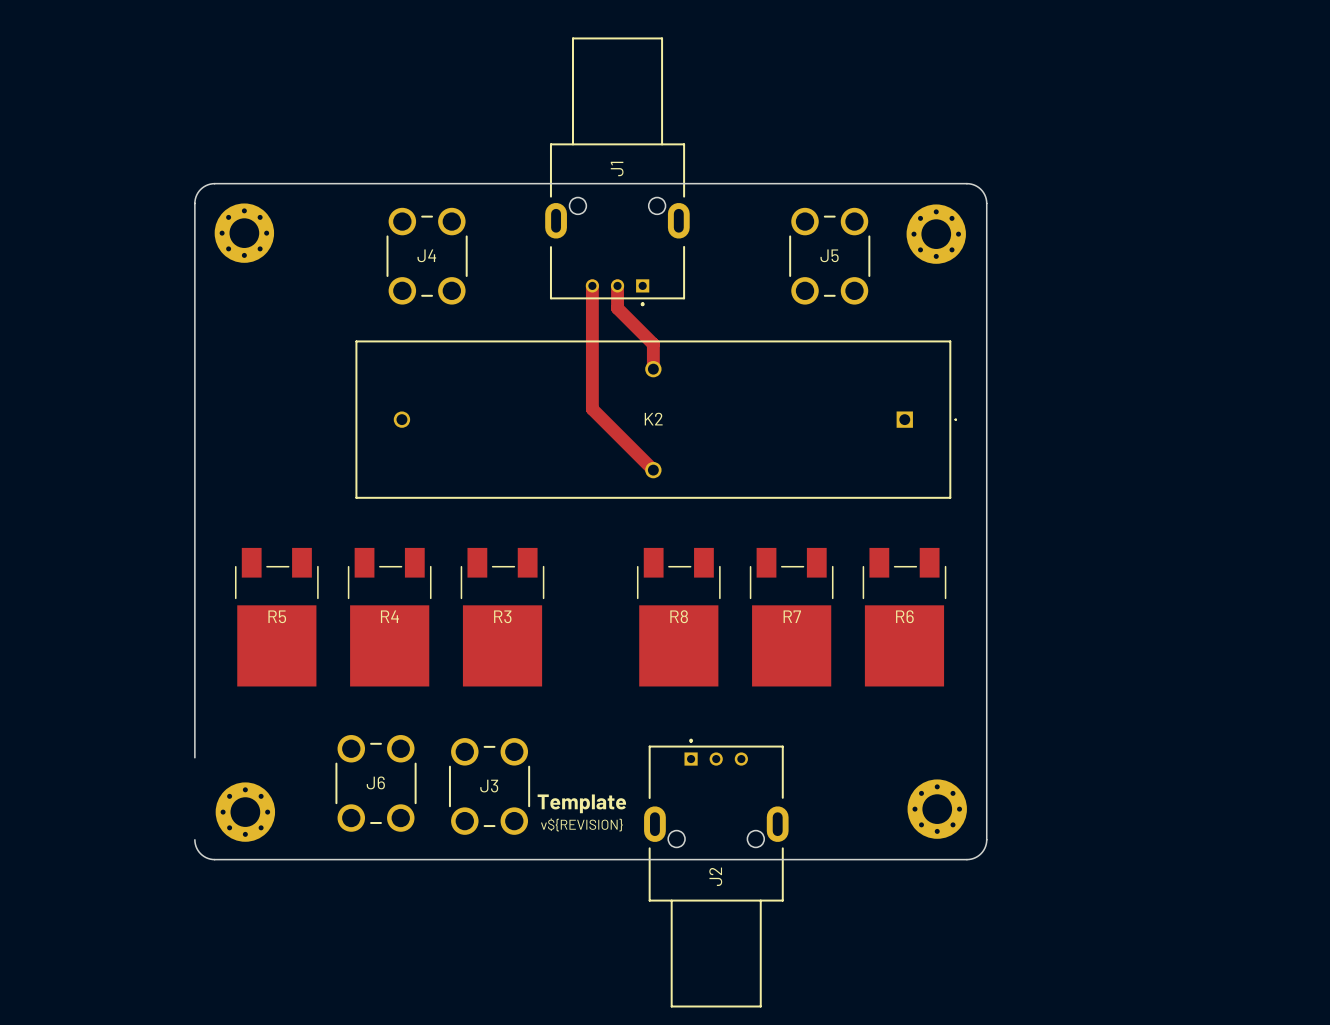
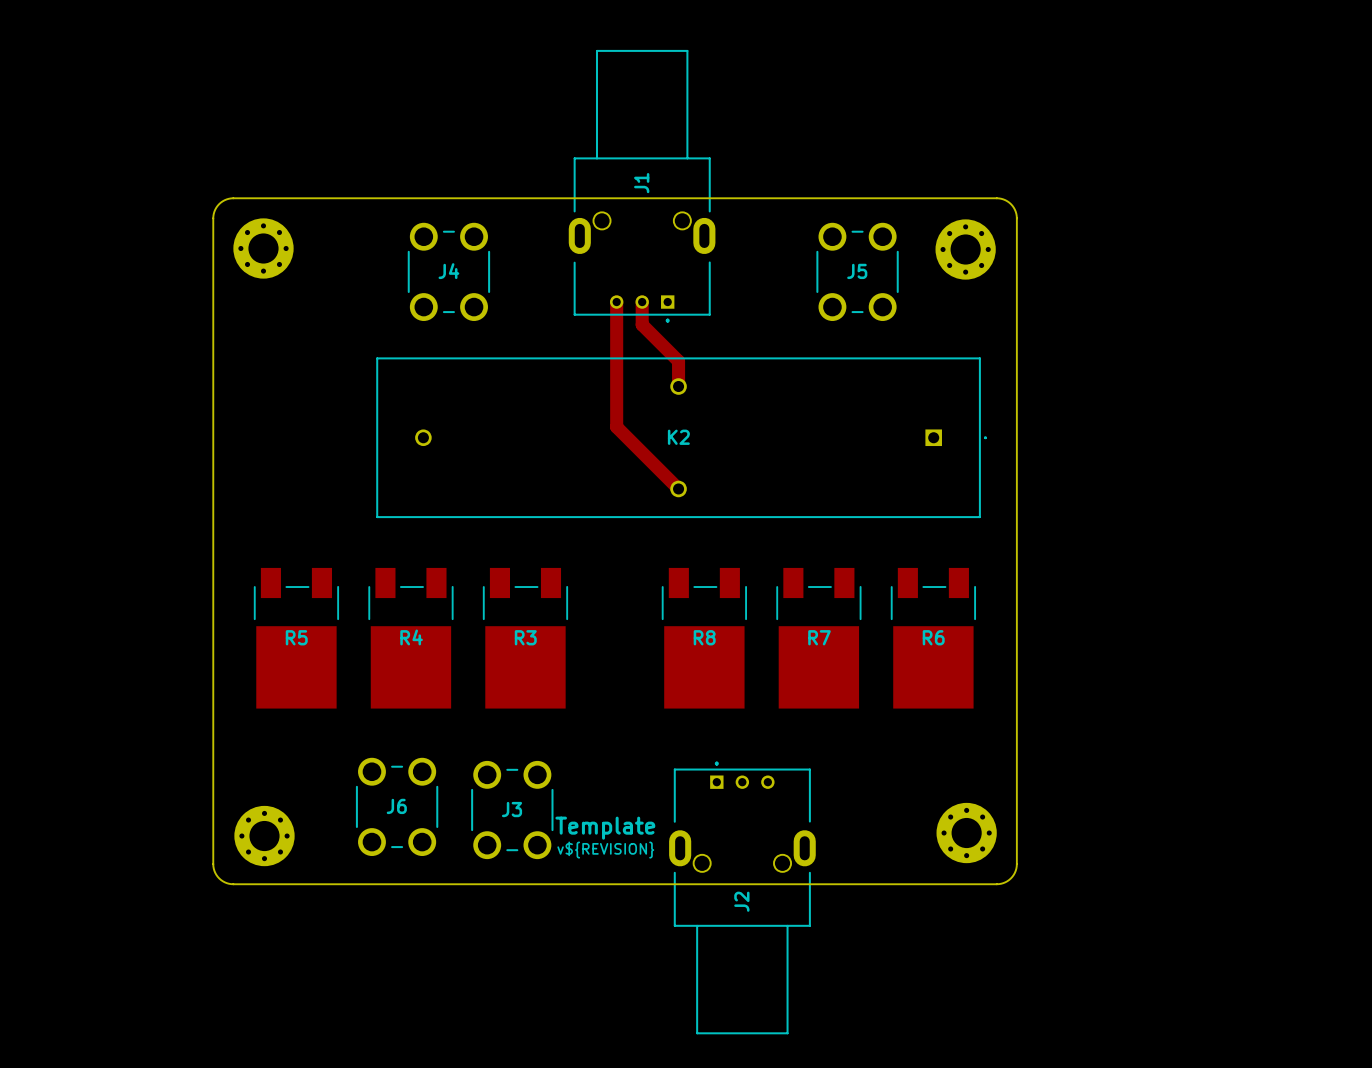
board edge: (194, 839) (200, 853) (214, 859) -> (213, 780) (213, 868) (220, 879) (233, 884)

